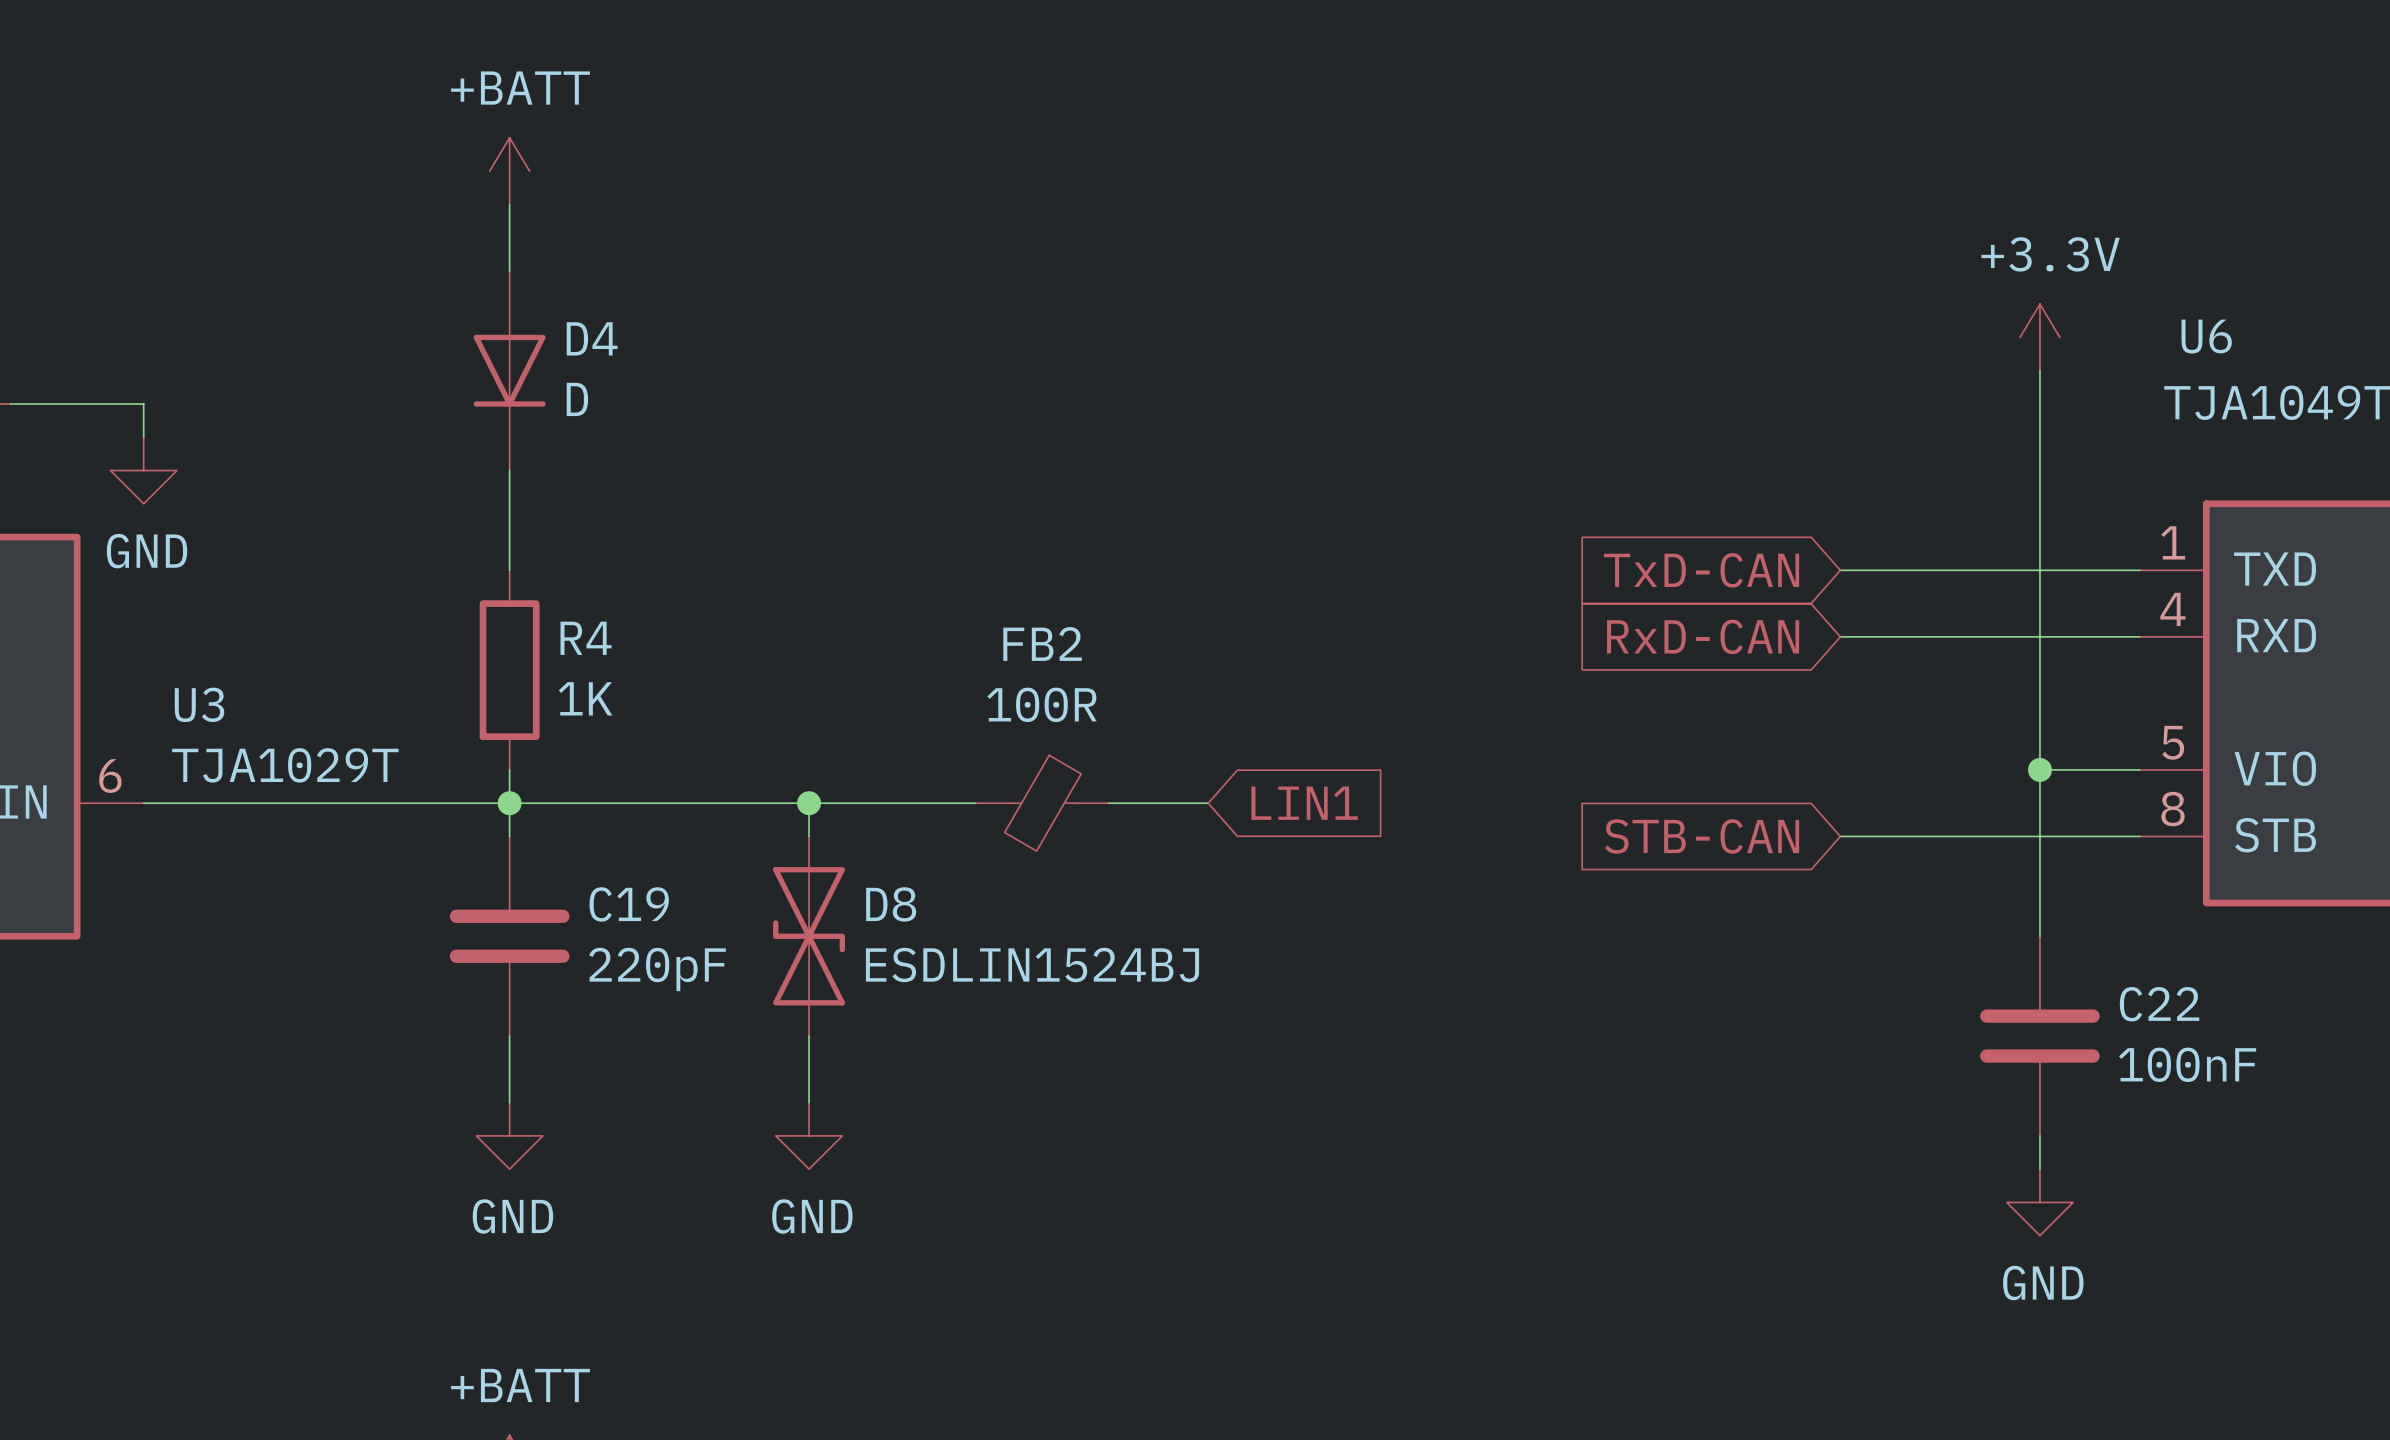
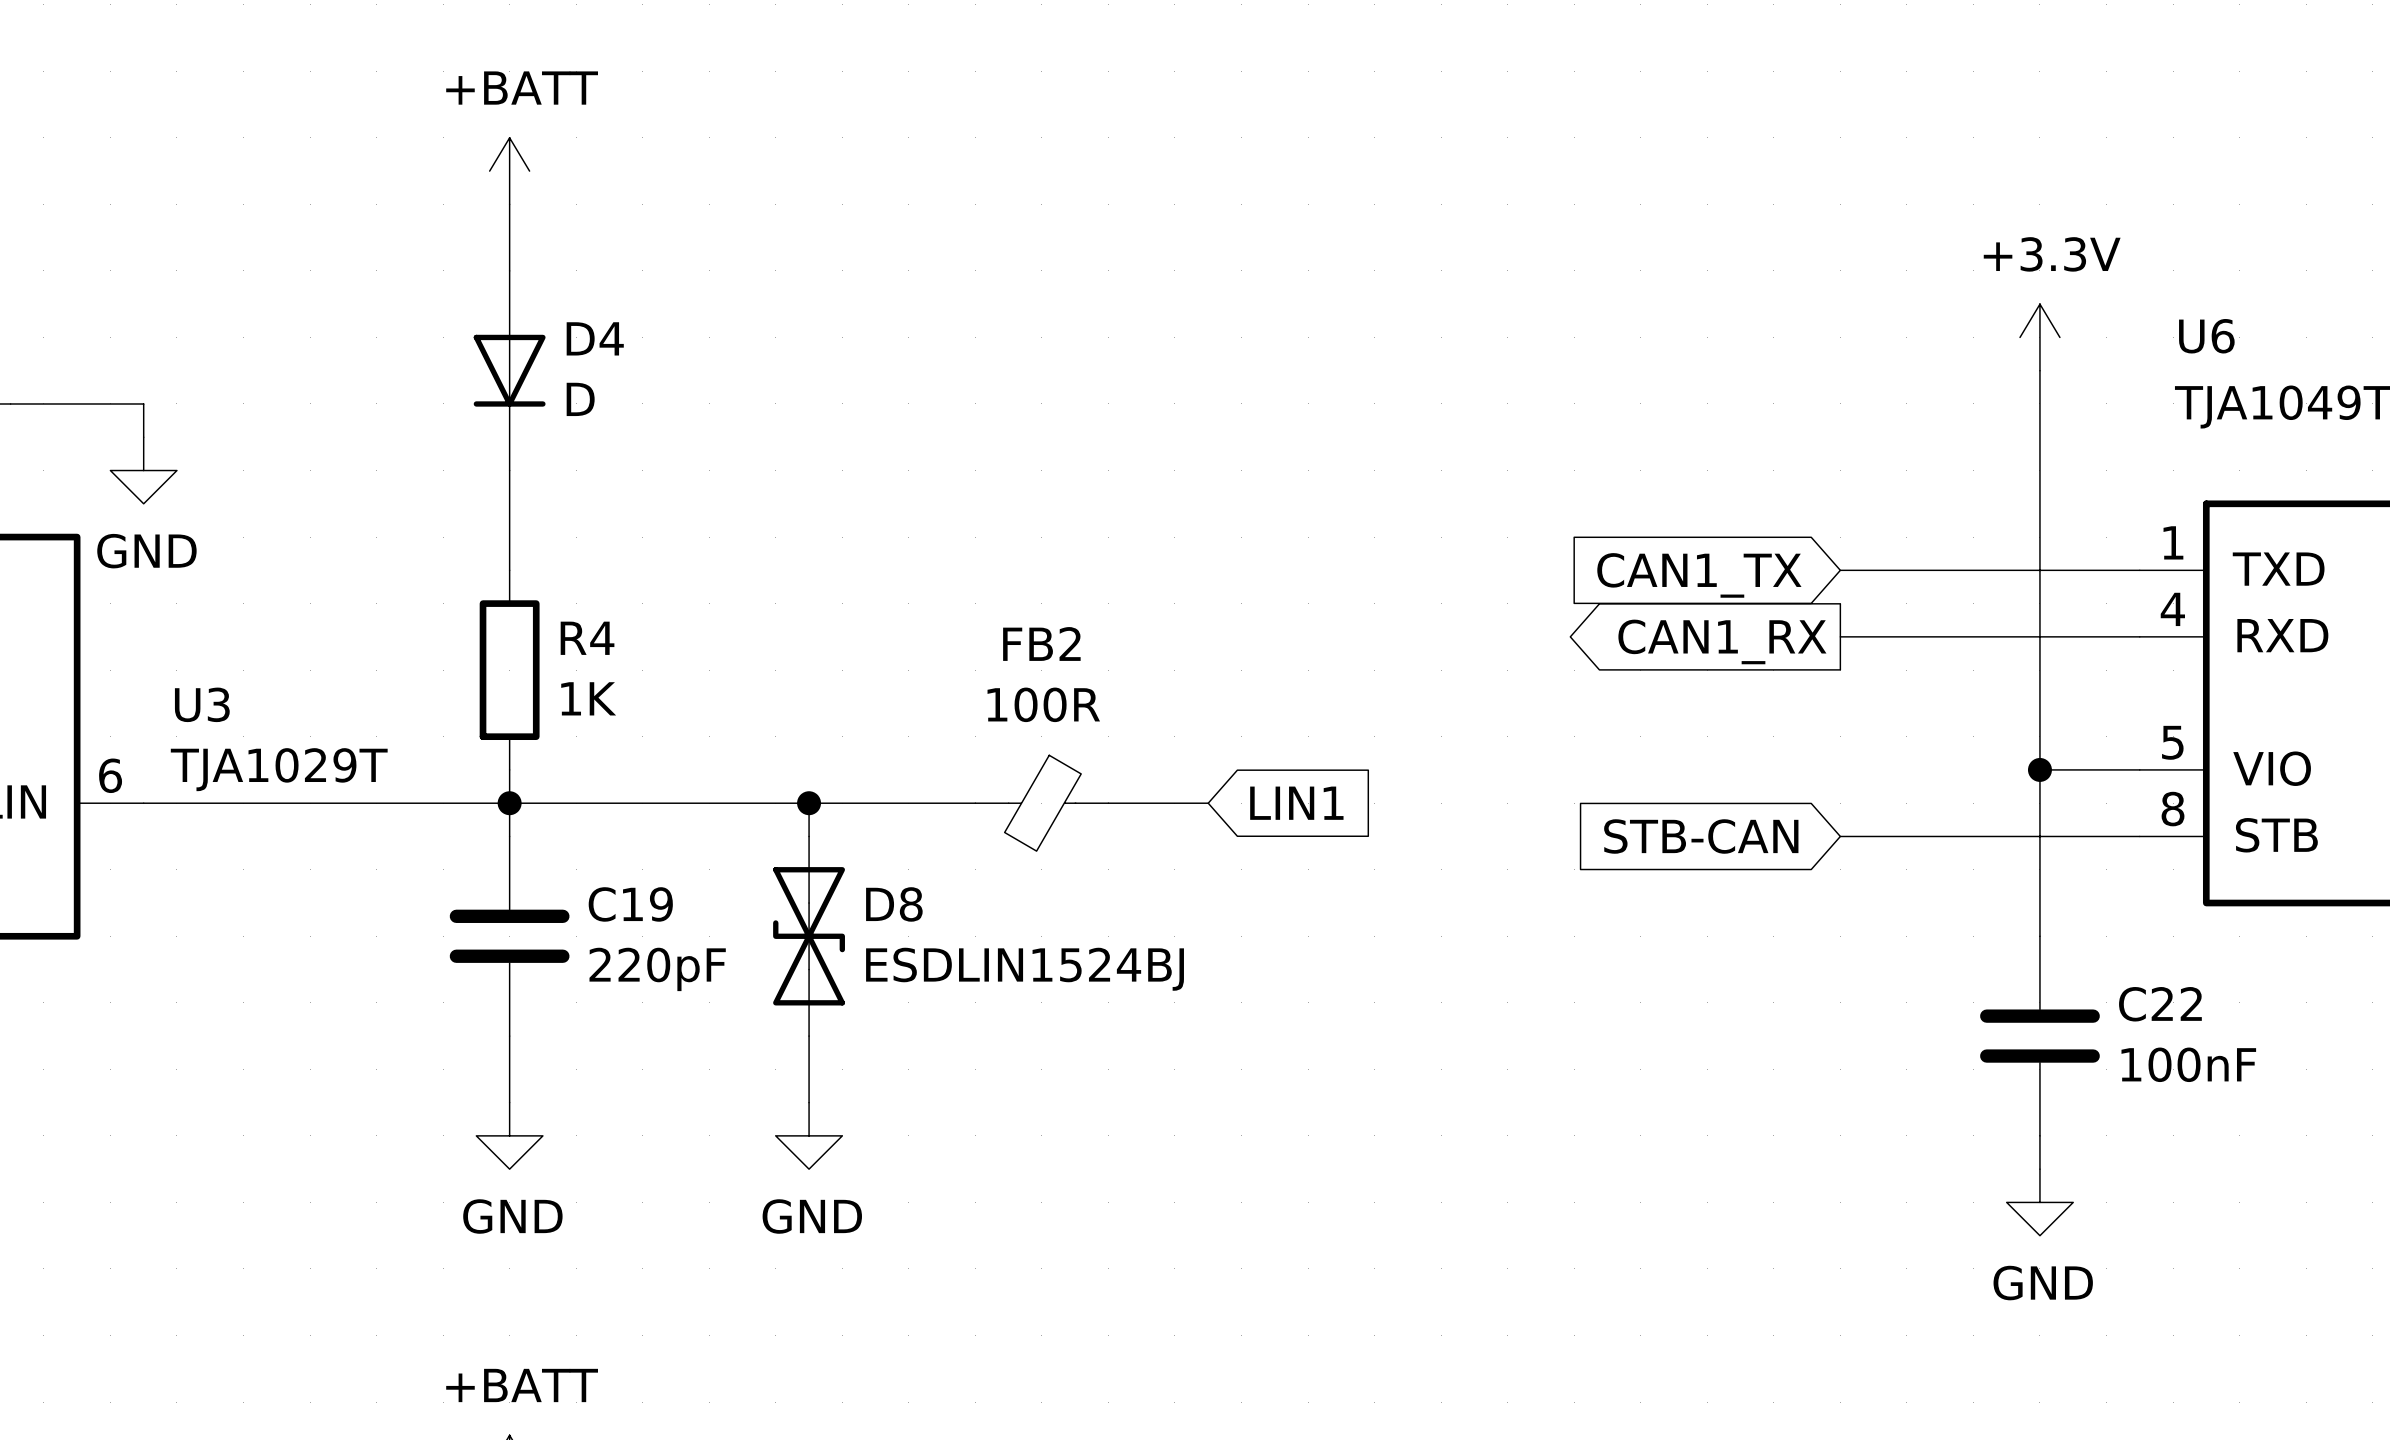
global label: TxD-CAN (1701, 570) -> CAN1_TX (1699, 575)
global label shape: input (1703, 636) -> output (1722, 641)
global label: RxD-CAN (1703, 636) -> CAN1_RX (1722, 641)

